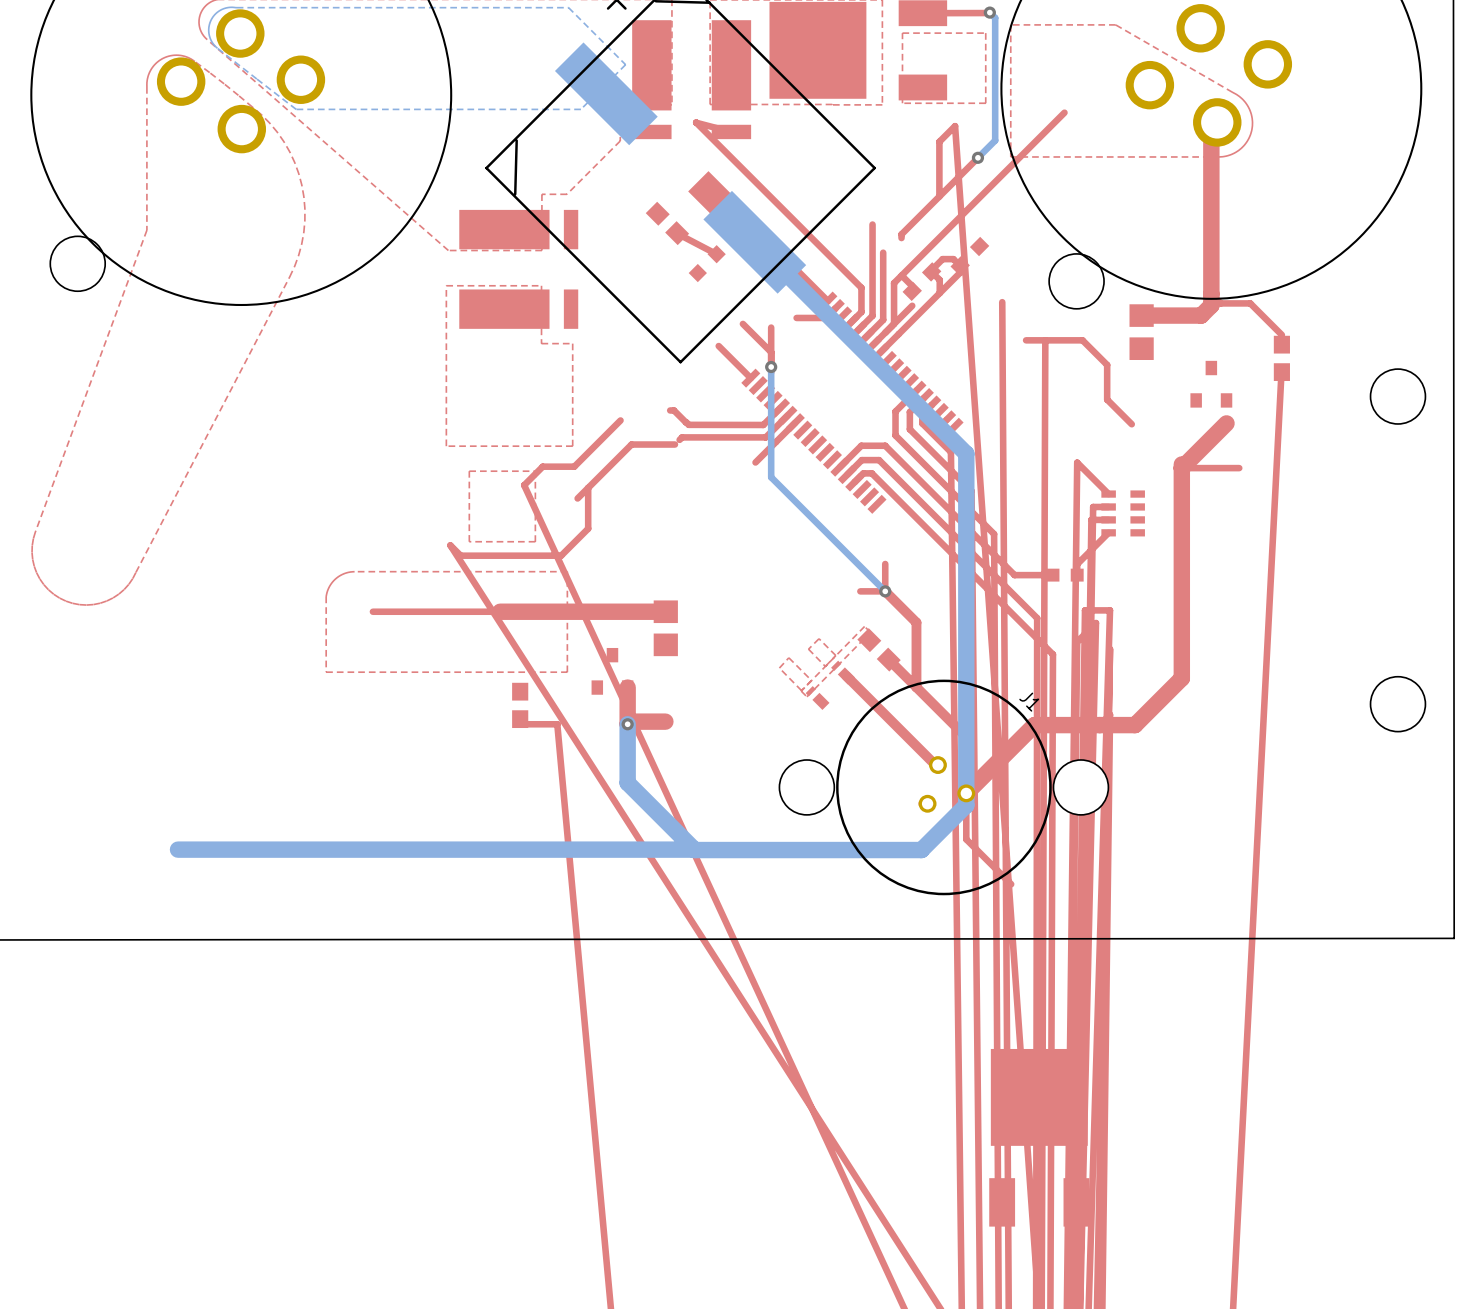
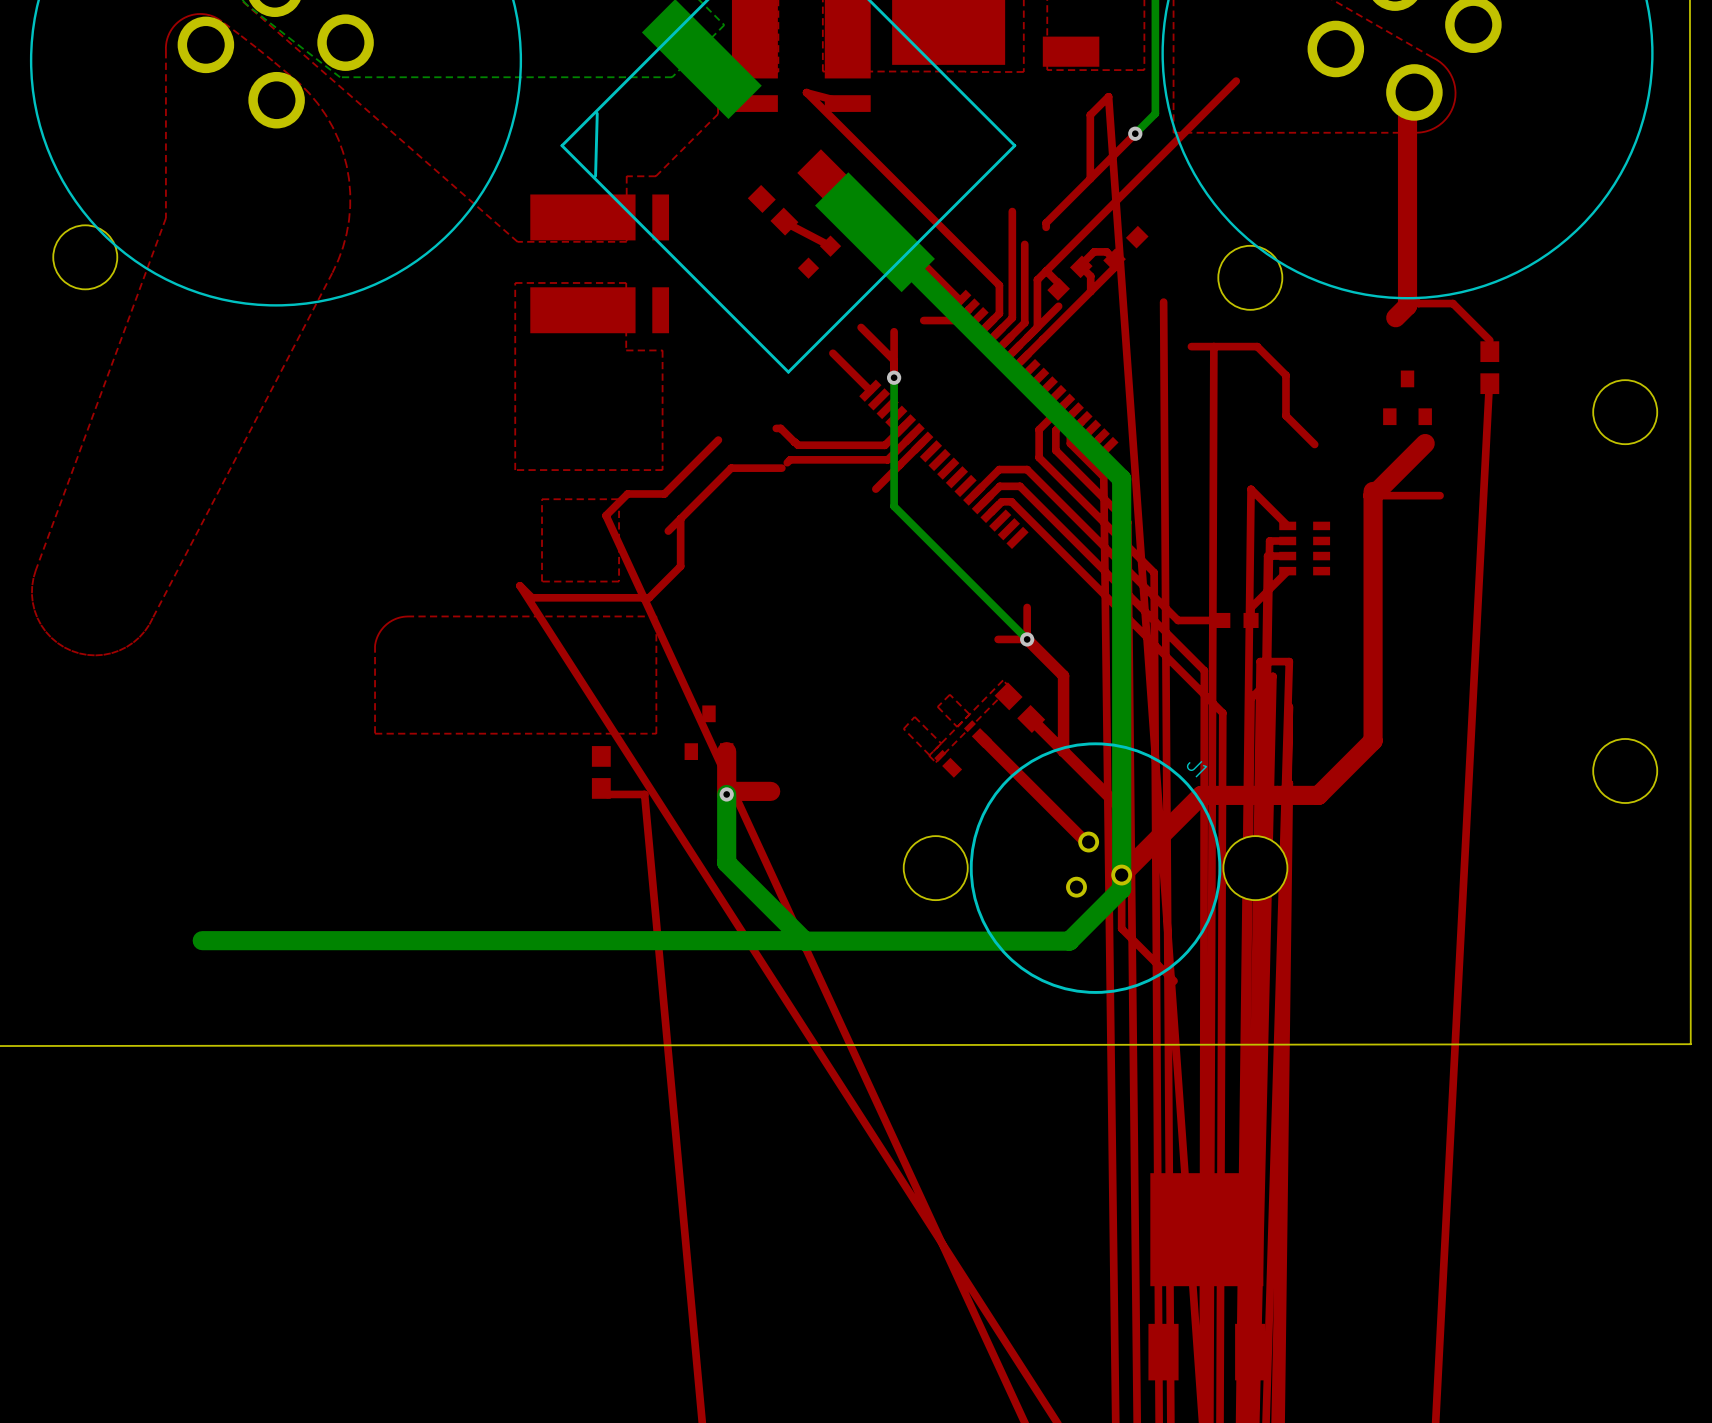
top track: (1201, 315) (1141, 315) -> none
part: (1141, 332) -> none
top track: (665, 611) (372, 611) -> none
part: (665, 628) -> none

